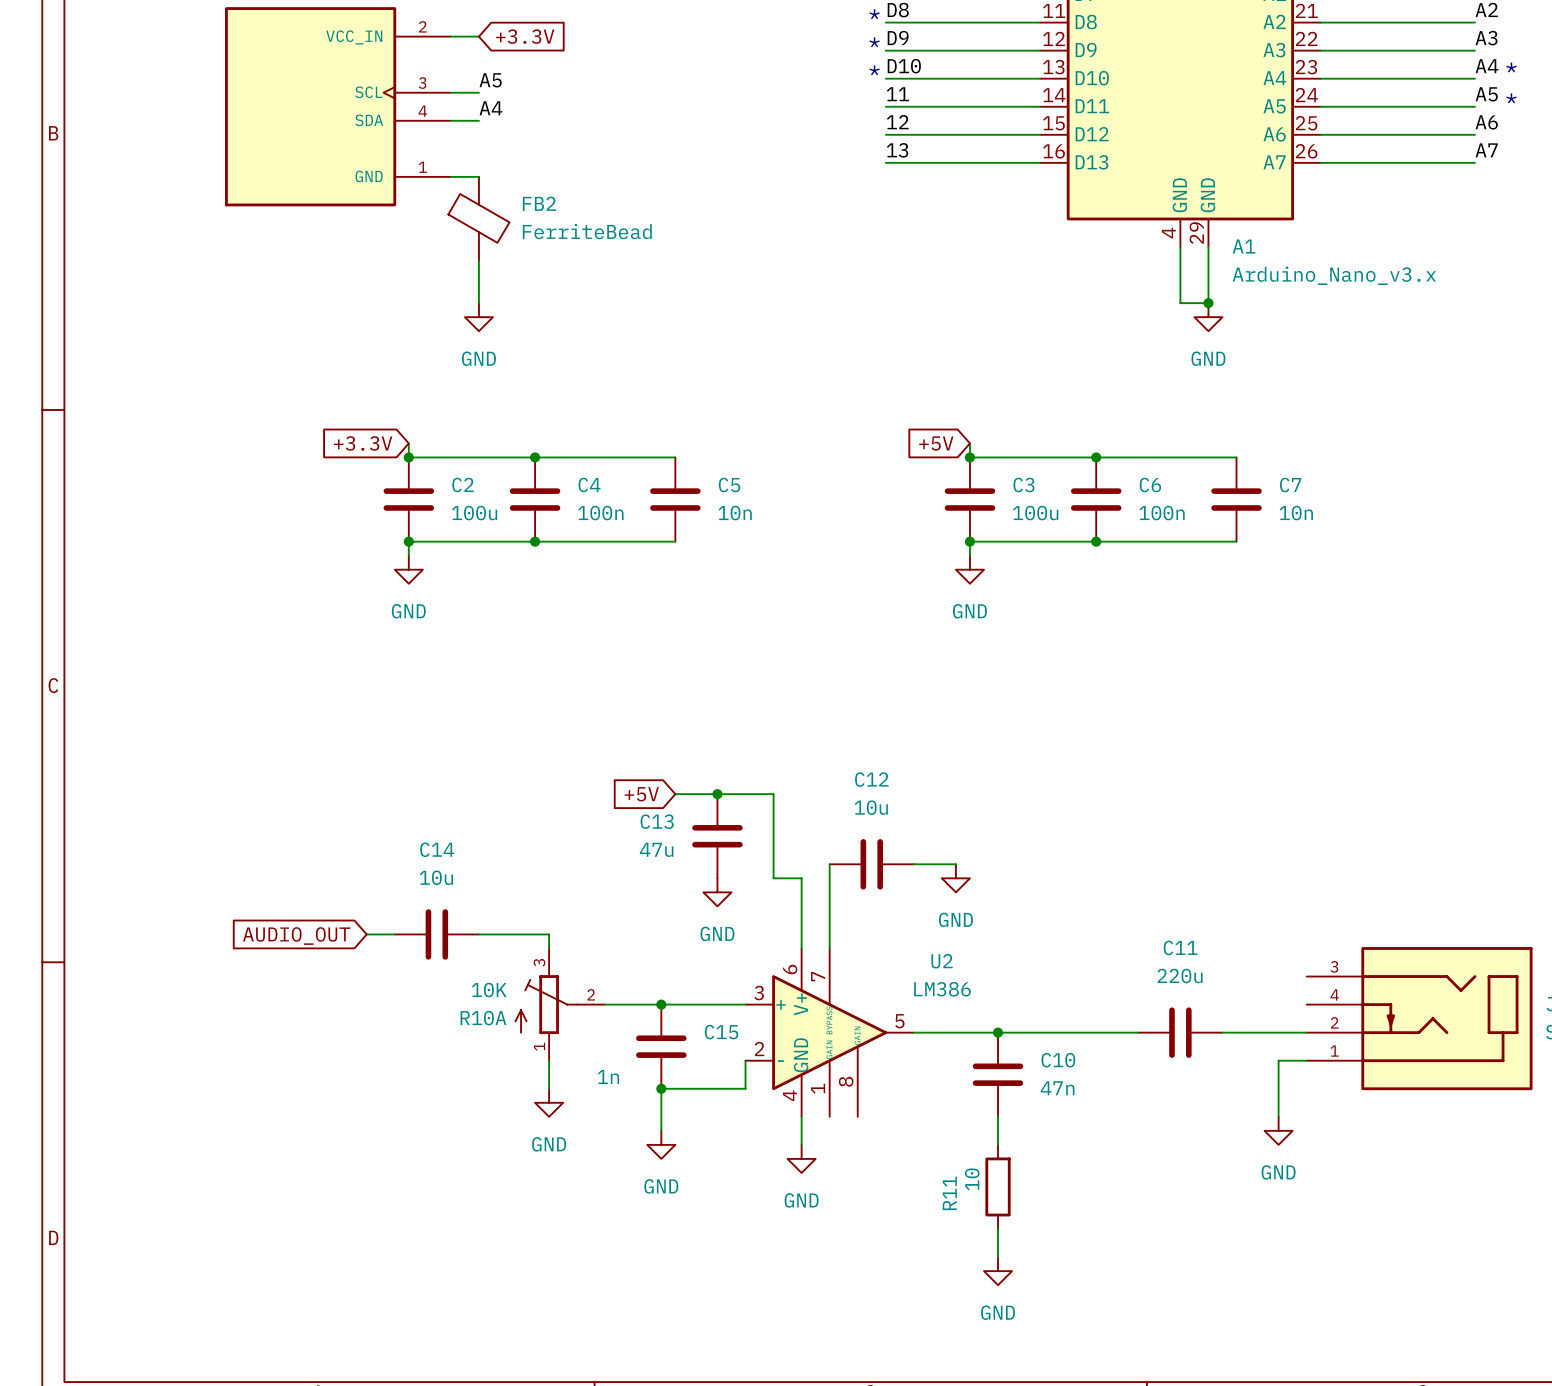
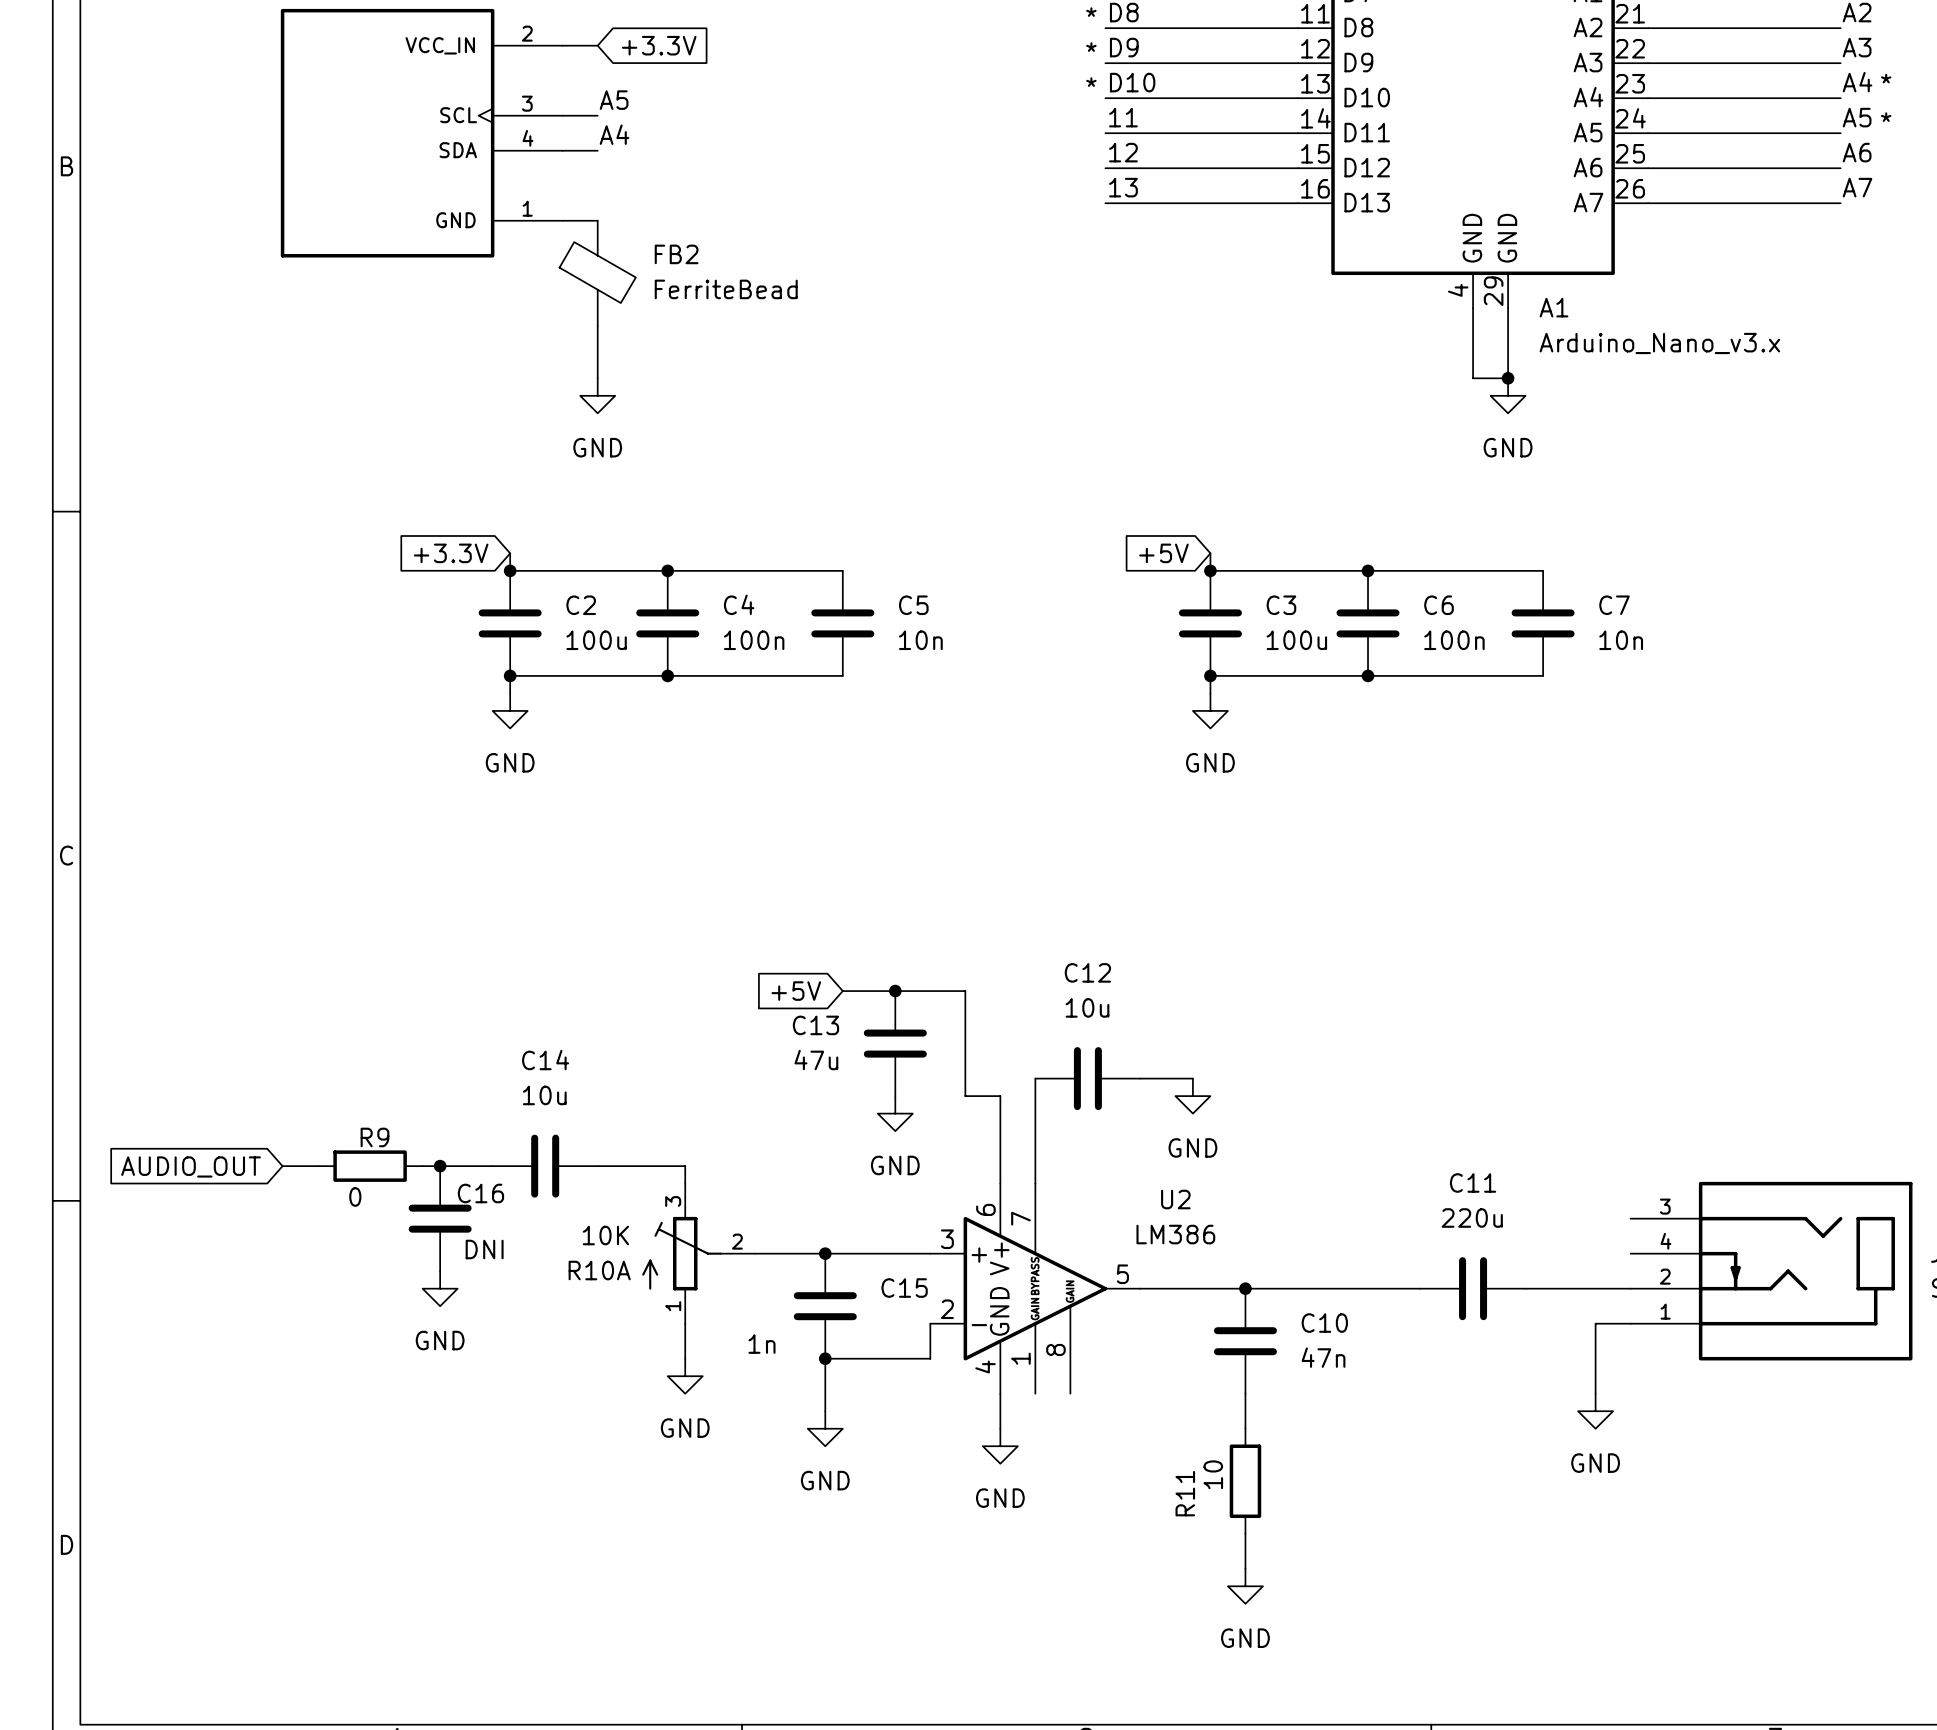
wire: none -> (282, 1166) (317, 1166)
R9: none -> 0 (370, 1166)
wire: none -> (422, 1166) (457, 1166)
junction: none -> (440, 1166)
global label position: AUDIO_OUT (296, 936) -> AUDIO_OUT (191, 1166)
C16: none -> DNI (440, 1218)
power symbol: none -> GND (440, 1288)

